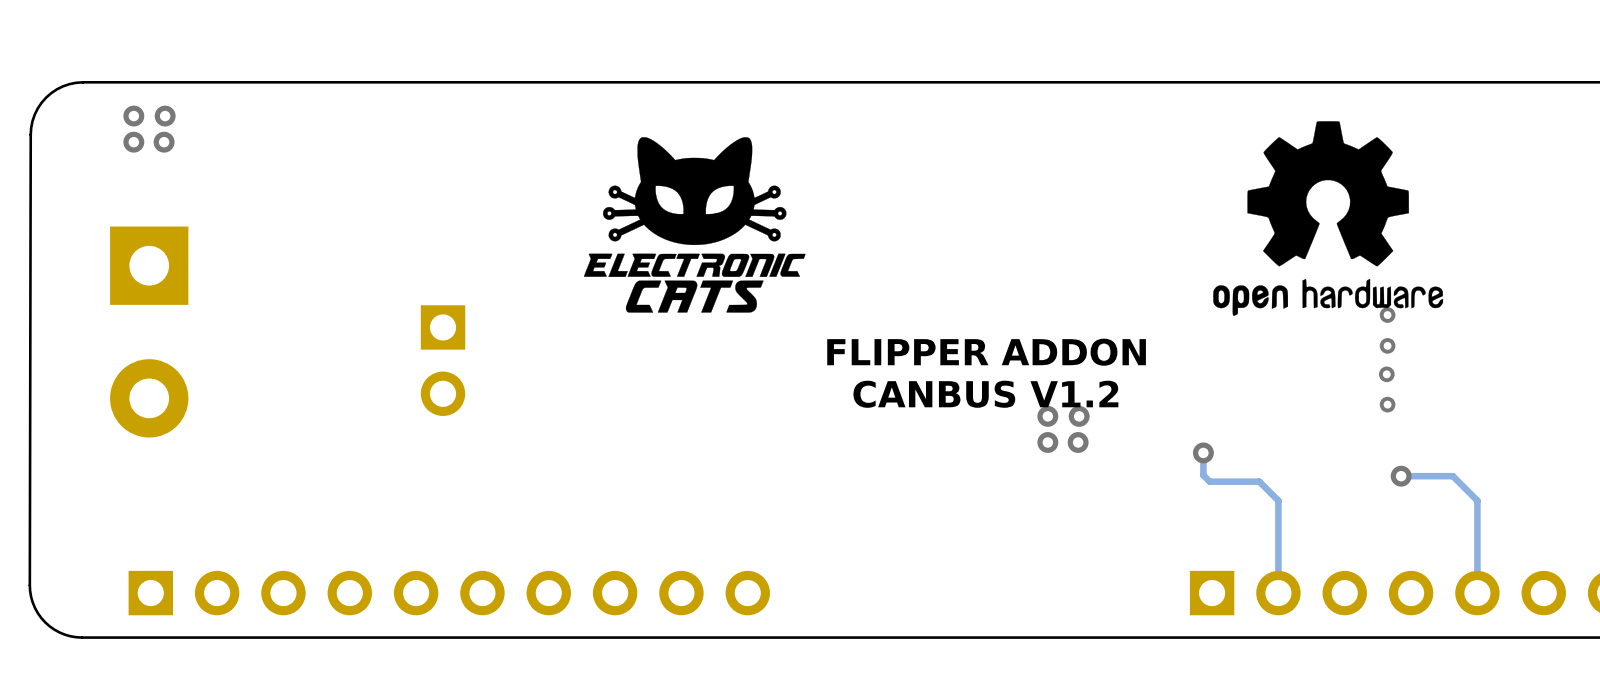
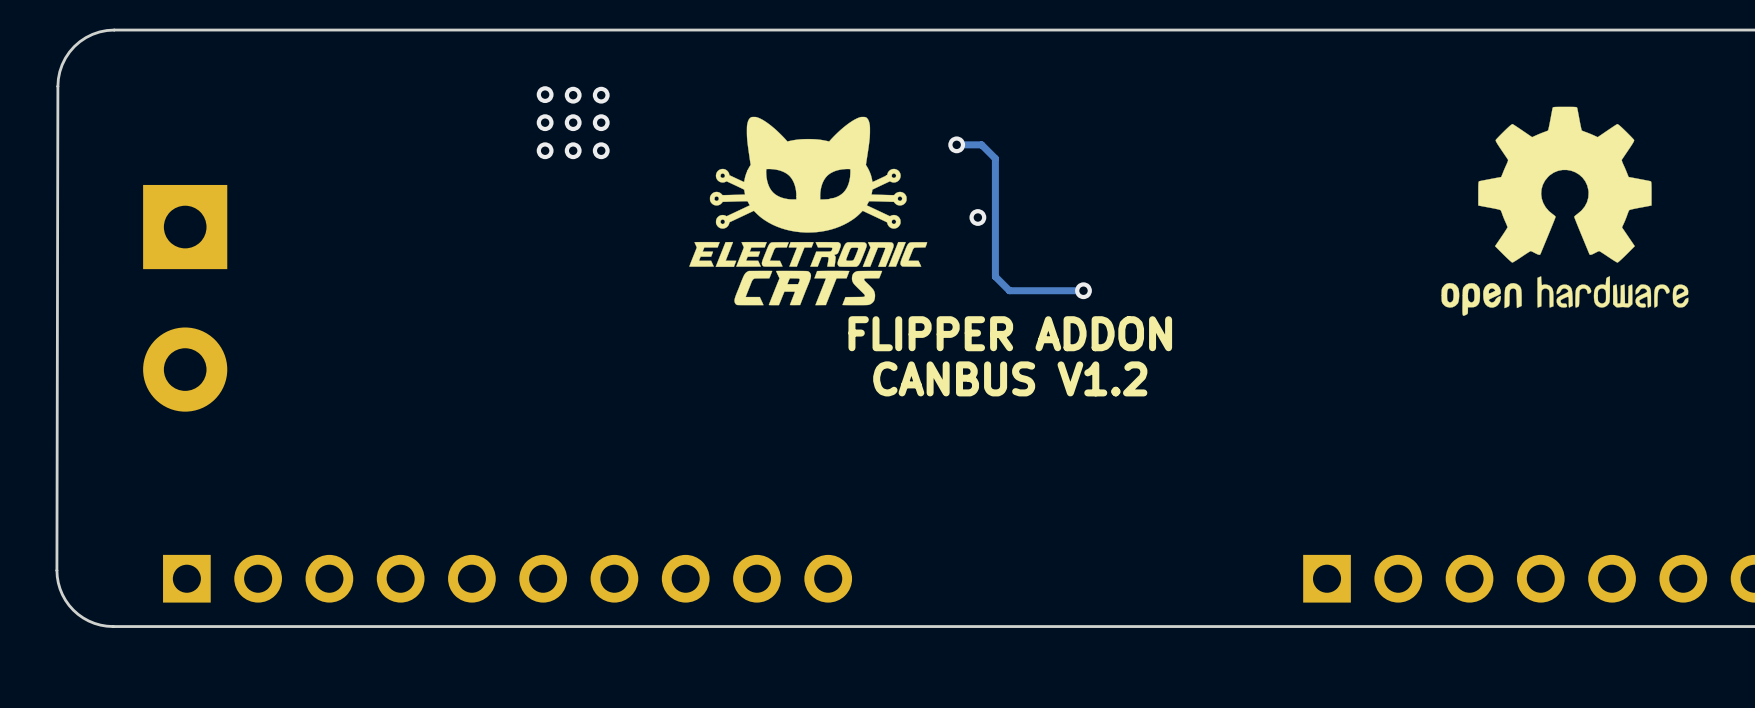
via: (133, 116) -> none
via: (165, 116) -> none
via: (133, 142) -> none
via: (164, 142) -> none
via: none -> (545, 94)
via: none -> (573, 95)
via: none -> (601, 95)
via: none -> (545, 122)
via: none -> (573, 122)
via: none -> (601, 122)
track: none -> (956, 144) (981, 144) (995, 158) (995, 276) (1009, 290) (1083, 290)
via: none -> (956, 144)
via: none -> (545, 150)
via: none -> (573, 150)
via: none -> (601, 150)
drawing position: (1328, 218) -> (1564, 211)
drawing position: (694, 224) -> (808, 211)
via: none -> (977, 217)
via: (1387, 315) -> none
via: none -> (1083, 290)
via: (1387, 345) -> none
text position: FLIPPER ADDON (986, 352) -> FLIPPER ADDON (1010, 333)
part: (443, 360) -> none
via: (1386, 374) -> none
text position: CANBUS V1.2 (985, 394) -> CANBUS V1.2 (1010, 378)
via: (1387, 404) -> none
via: (1047, 416) -> none
via: (1079, 416) -> none
via: (1047, 442) -> none
via: (1078, 442) -> none
track: (1203, 452) (1203, 475) (1209, 481) (1259, 481) (1278, 500) (1278, 593) -> none
via: (1203, 452) -> none
track: (1401, 476) (1452, 476) (1477, 500) (1477, 593) -> none
via: (1401, 476) -> none

